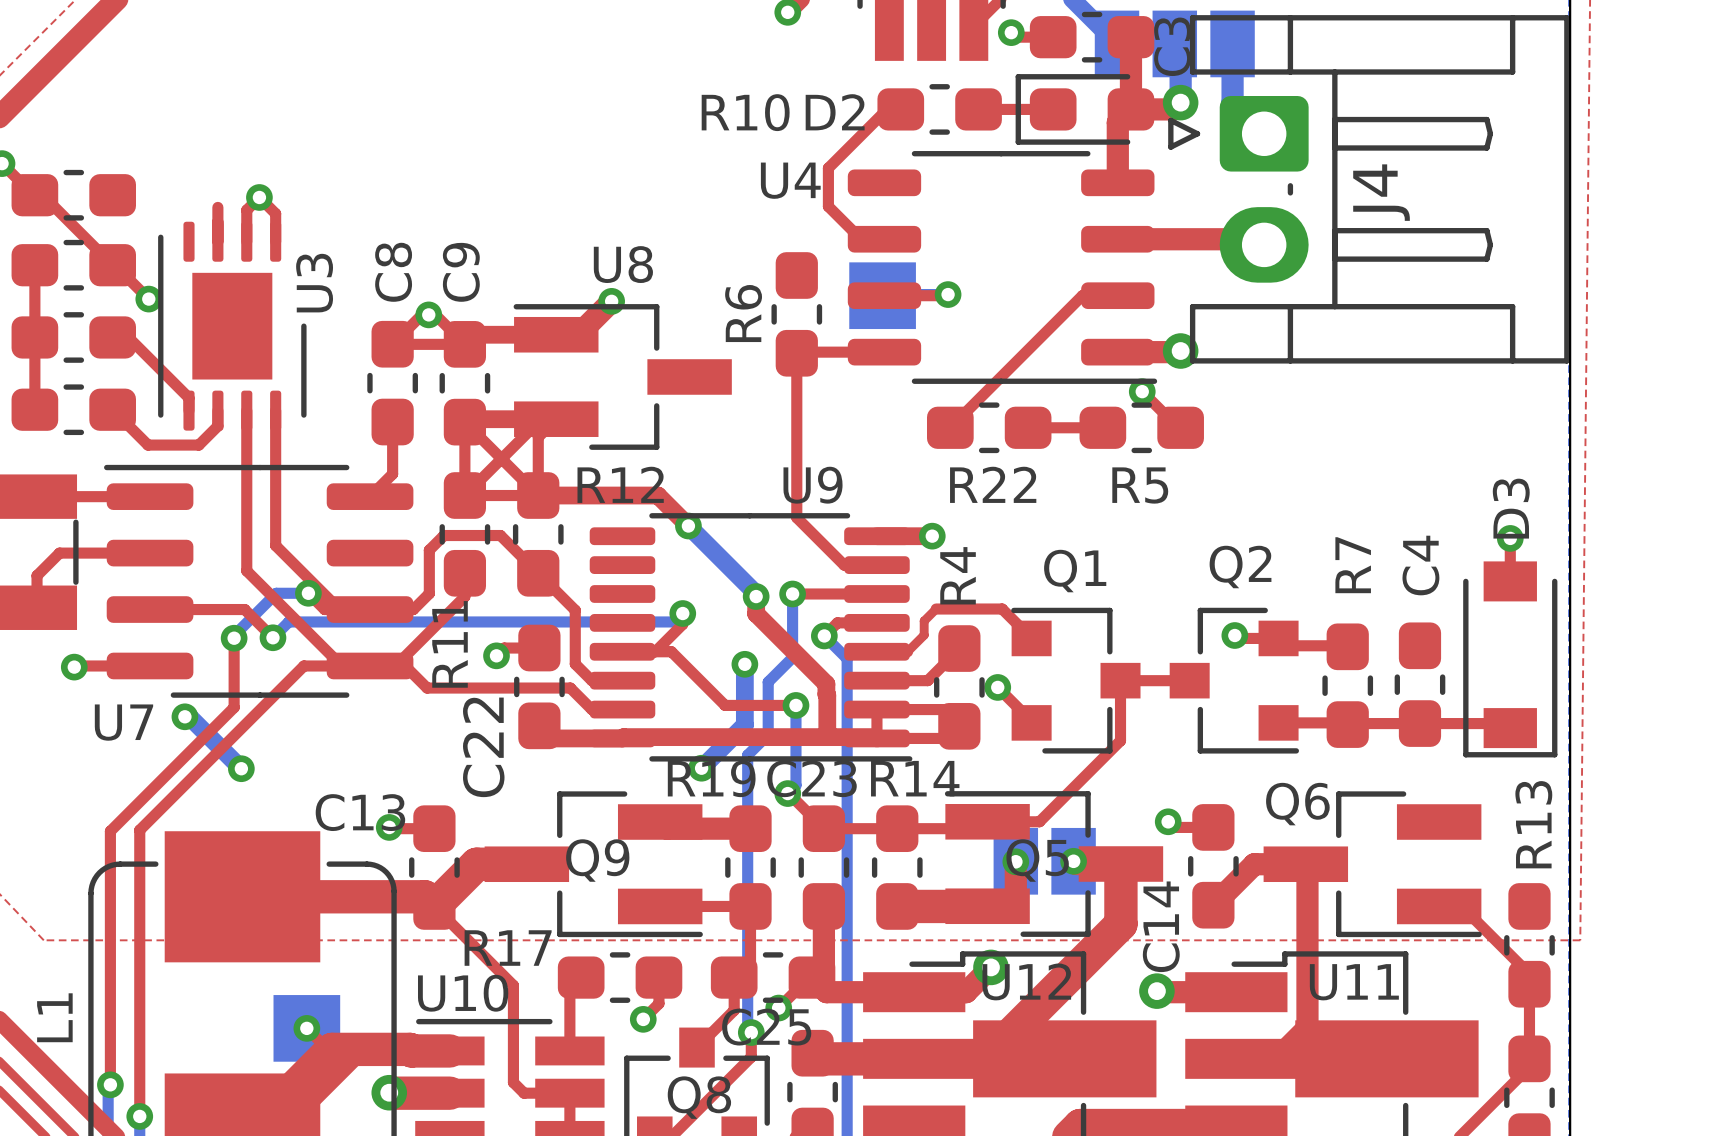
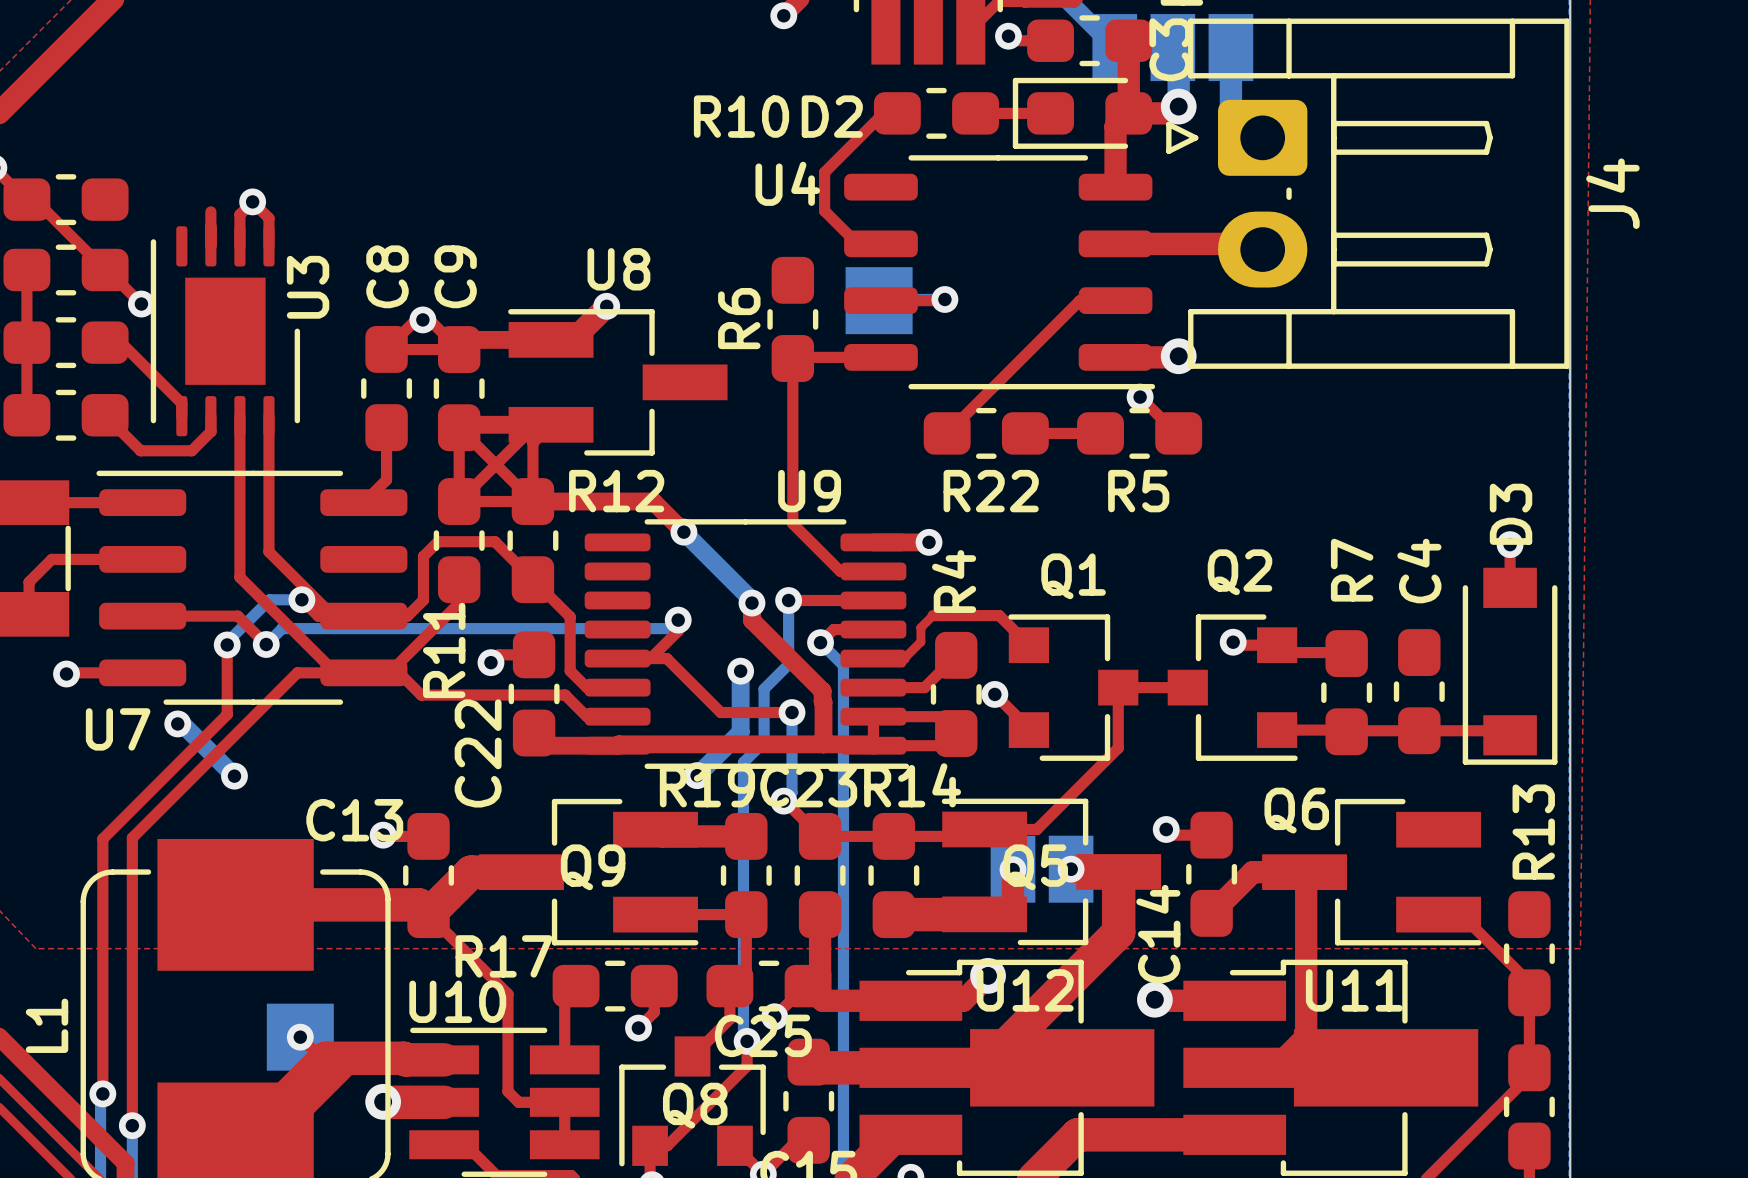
J4 name position: J4 (1381, 192) -> J4 (1612, 193)

